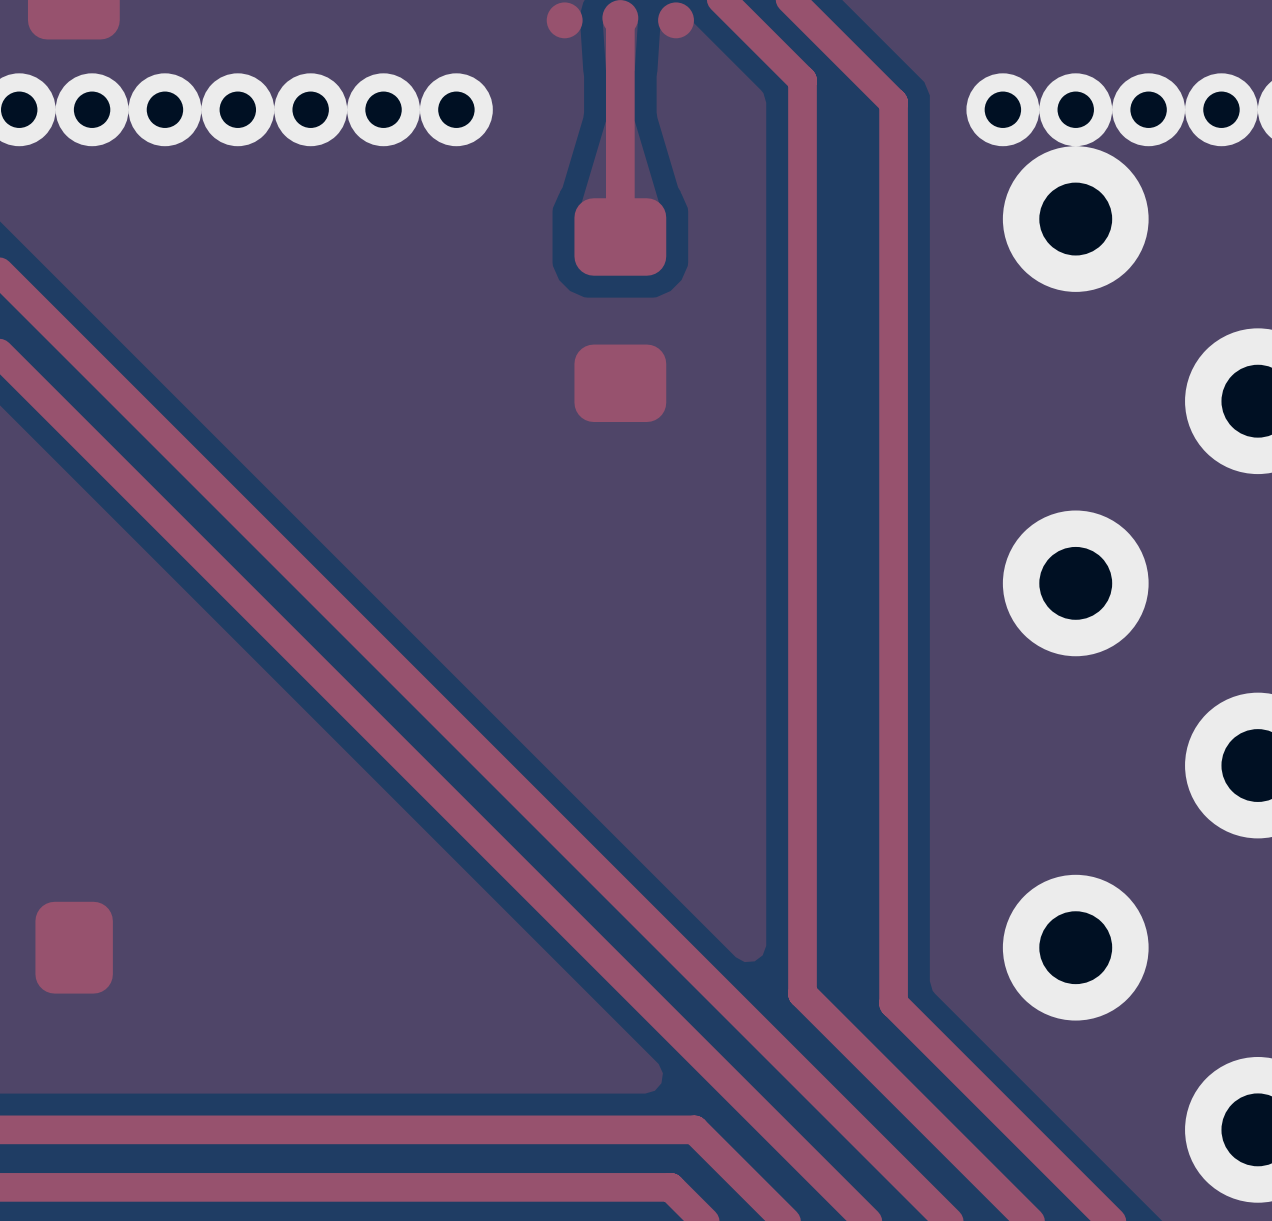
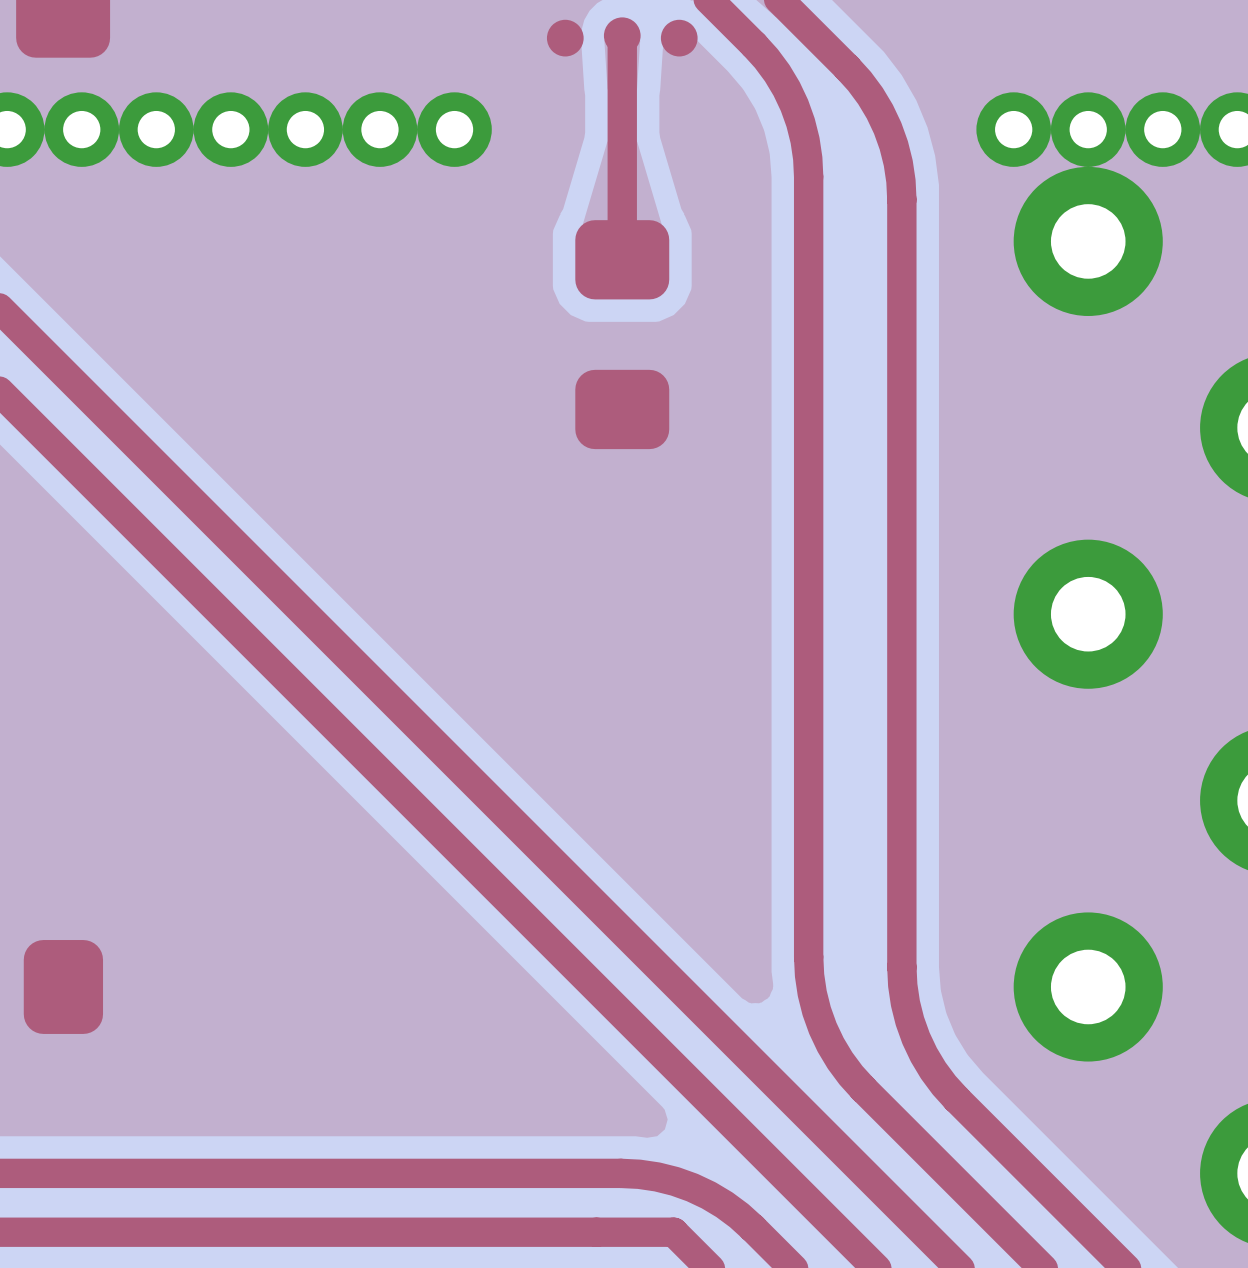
top track: (749, 27) (802, 80) (802, 155) -> (754, 44) (777, 73) (794, 105) (805, 140) (808, 176)
top track: (840, 49) (893, 102) (893, 178) -> (847, 67) (870, 95) (887, 128) (898, 163) (901, 199)
top track: (802, 918) (802, 993) (855, 1047) -> (808, 957) (812, 993) (822, 1028) (840, 1060) (863, 1088)
top track: (893, 928) (893, 1003) (946, 1056) -> (901, 966) (905, 1003) (916, 1038) (933, 1070) (956, 1098)
top track: (619, 1129) (694, 1129) (747, 1183) -> (620, 1173) (657, 1176) (692, 1187) (724, 1204) (752, 1227)

